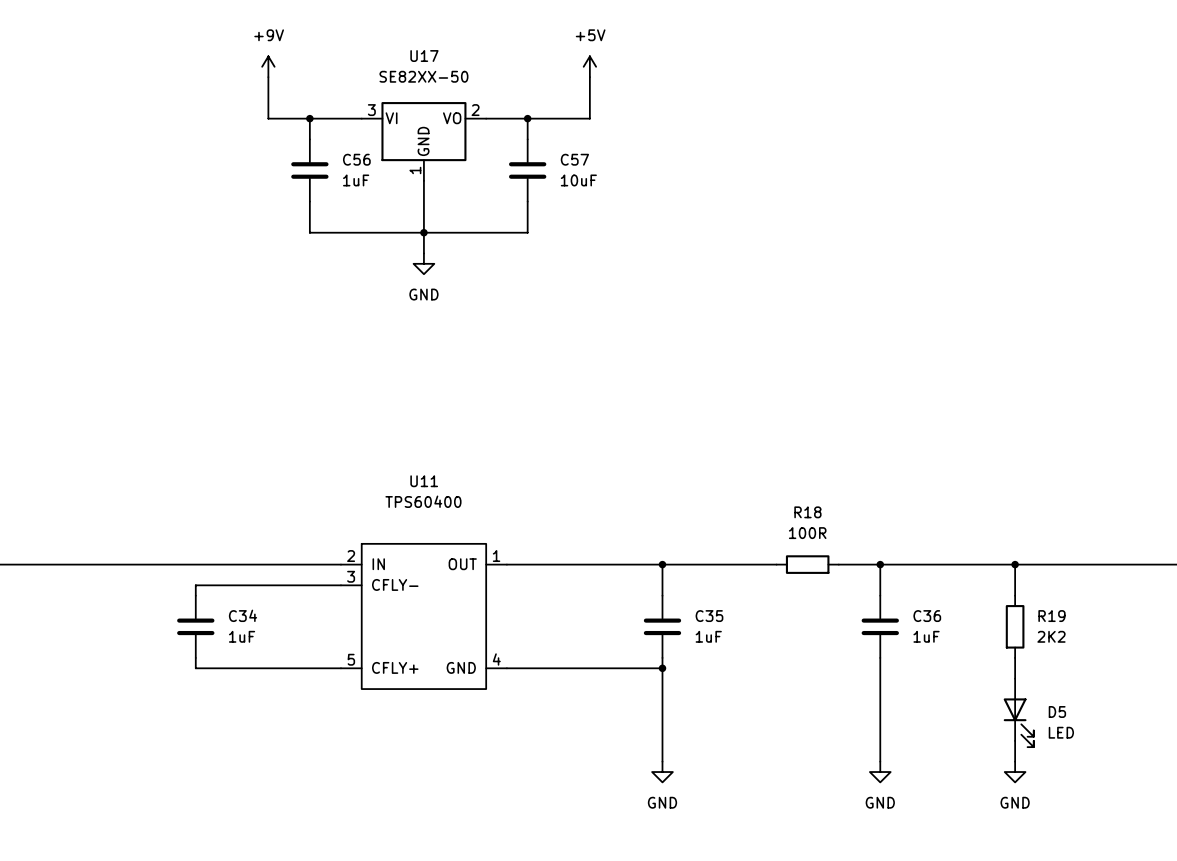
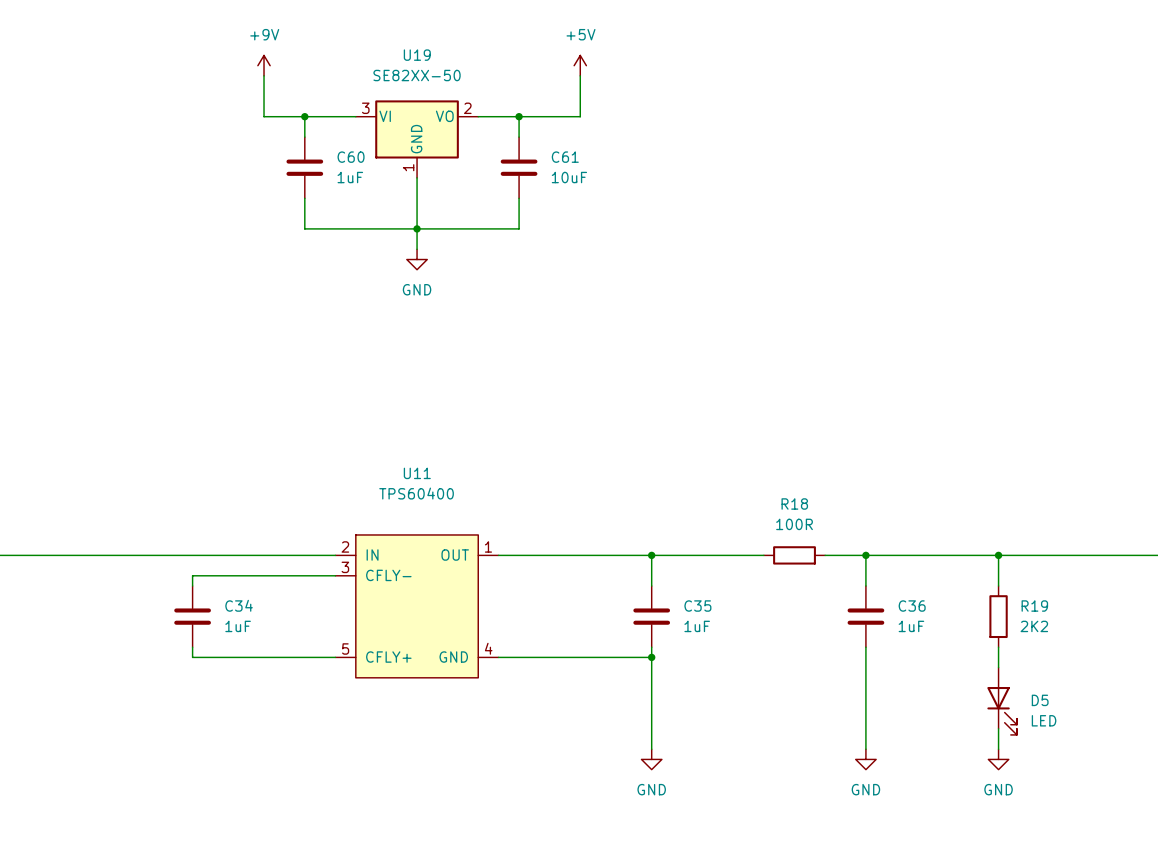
U17 name: U17 (424, 56) -> U19 (417, 55)
C56 name: C56 (356, 159) -> C60 (351, 157)
C57 name: C57 (574, 159) -> C61 (565, 157)

